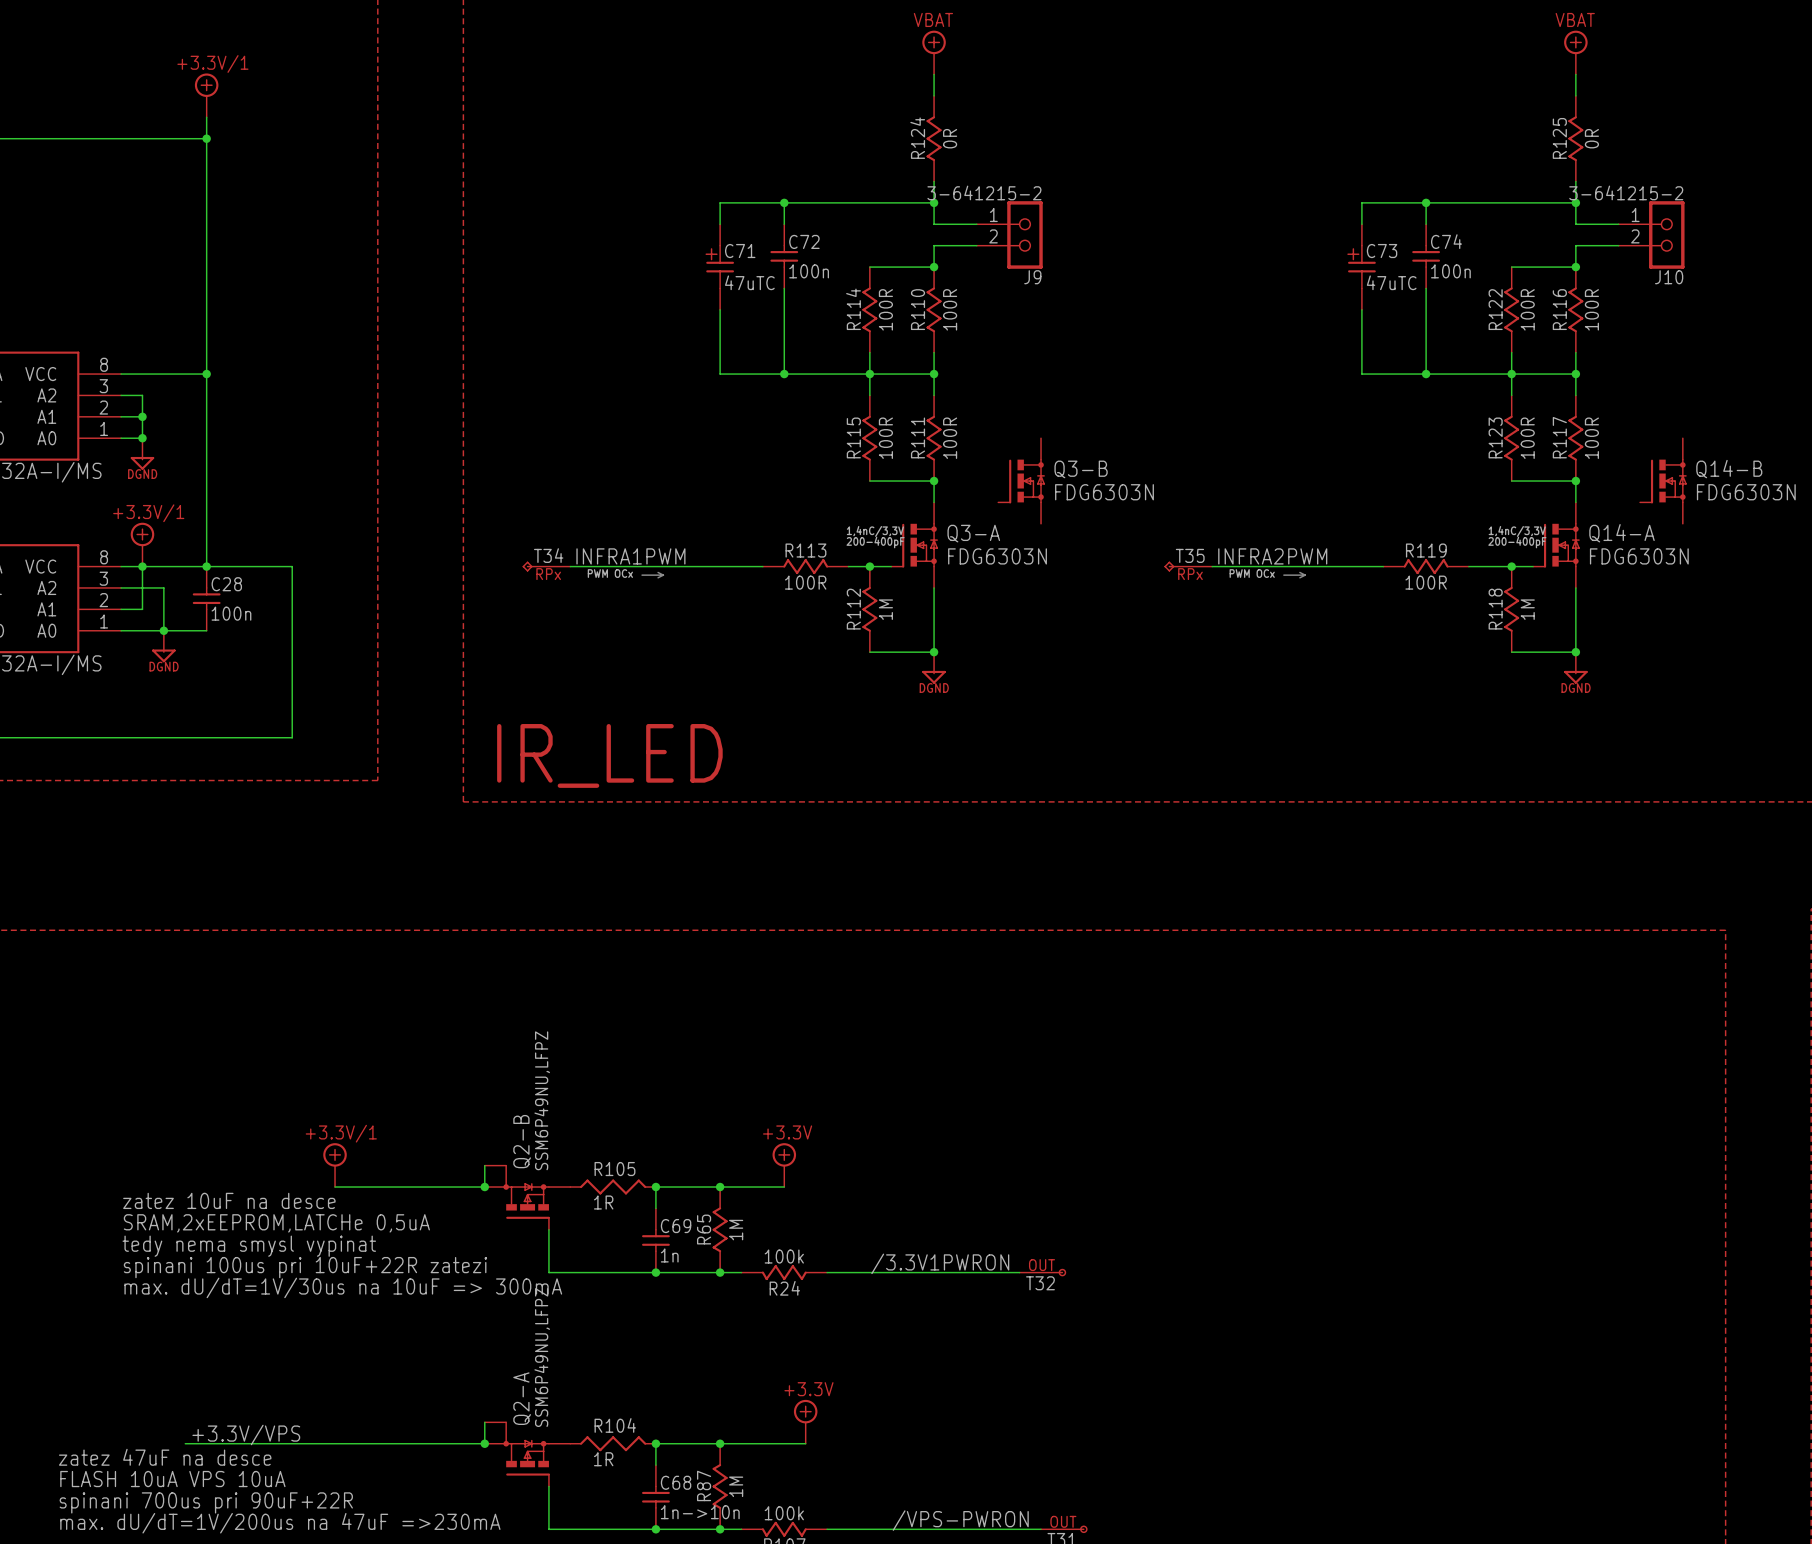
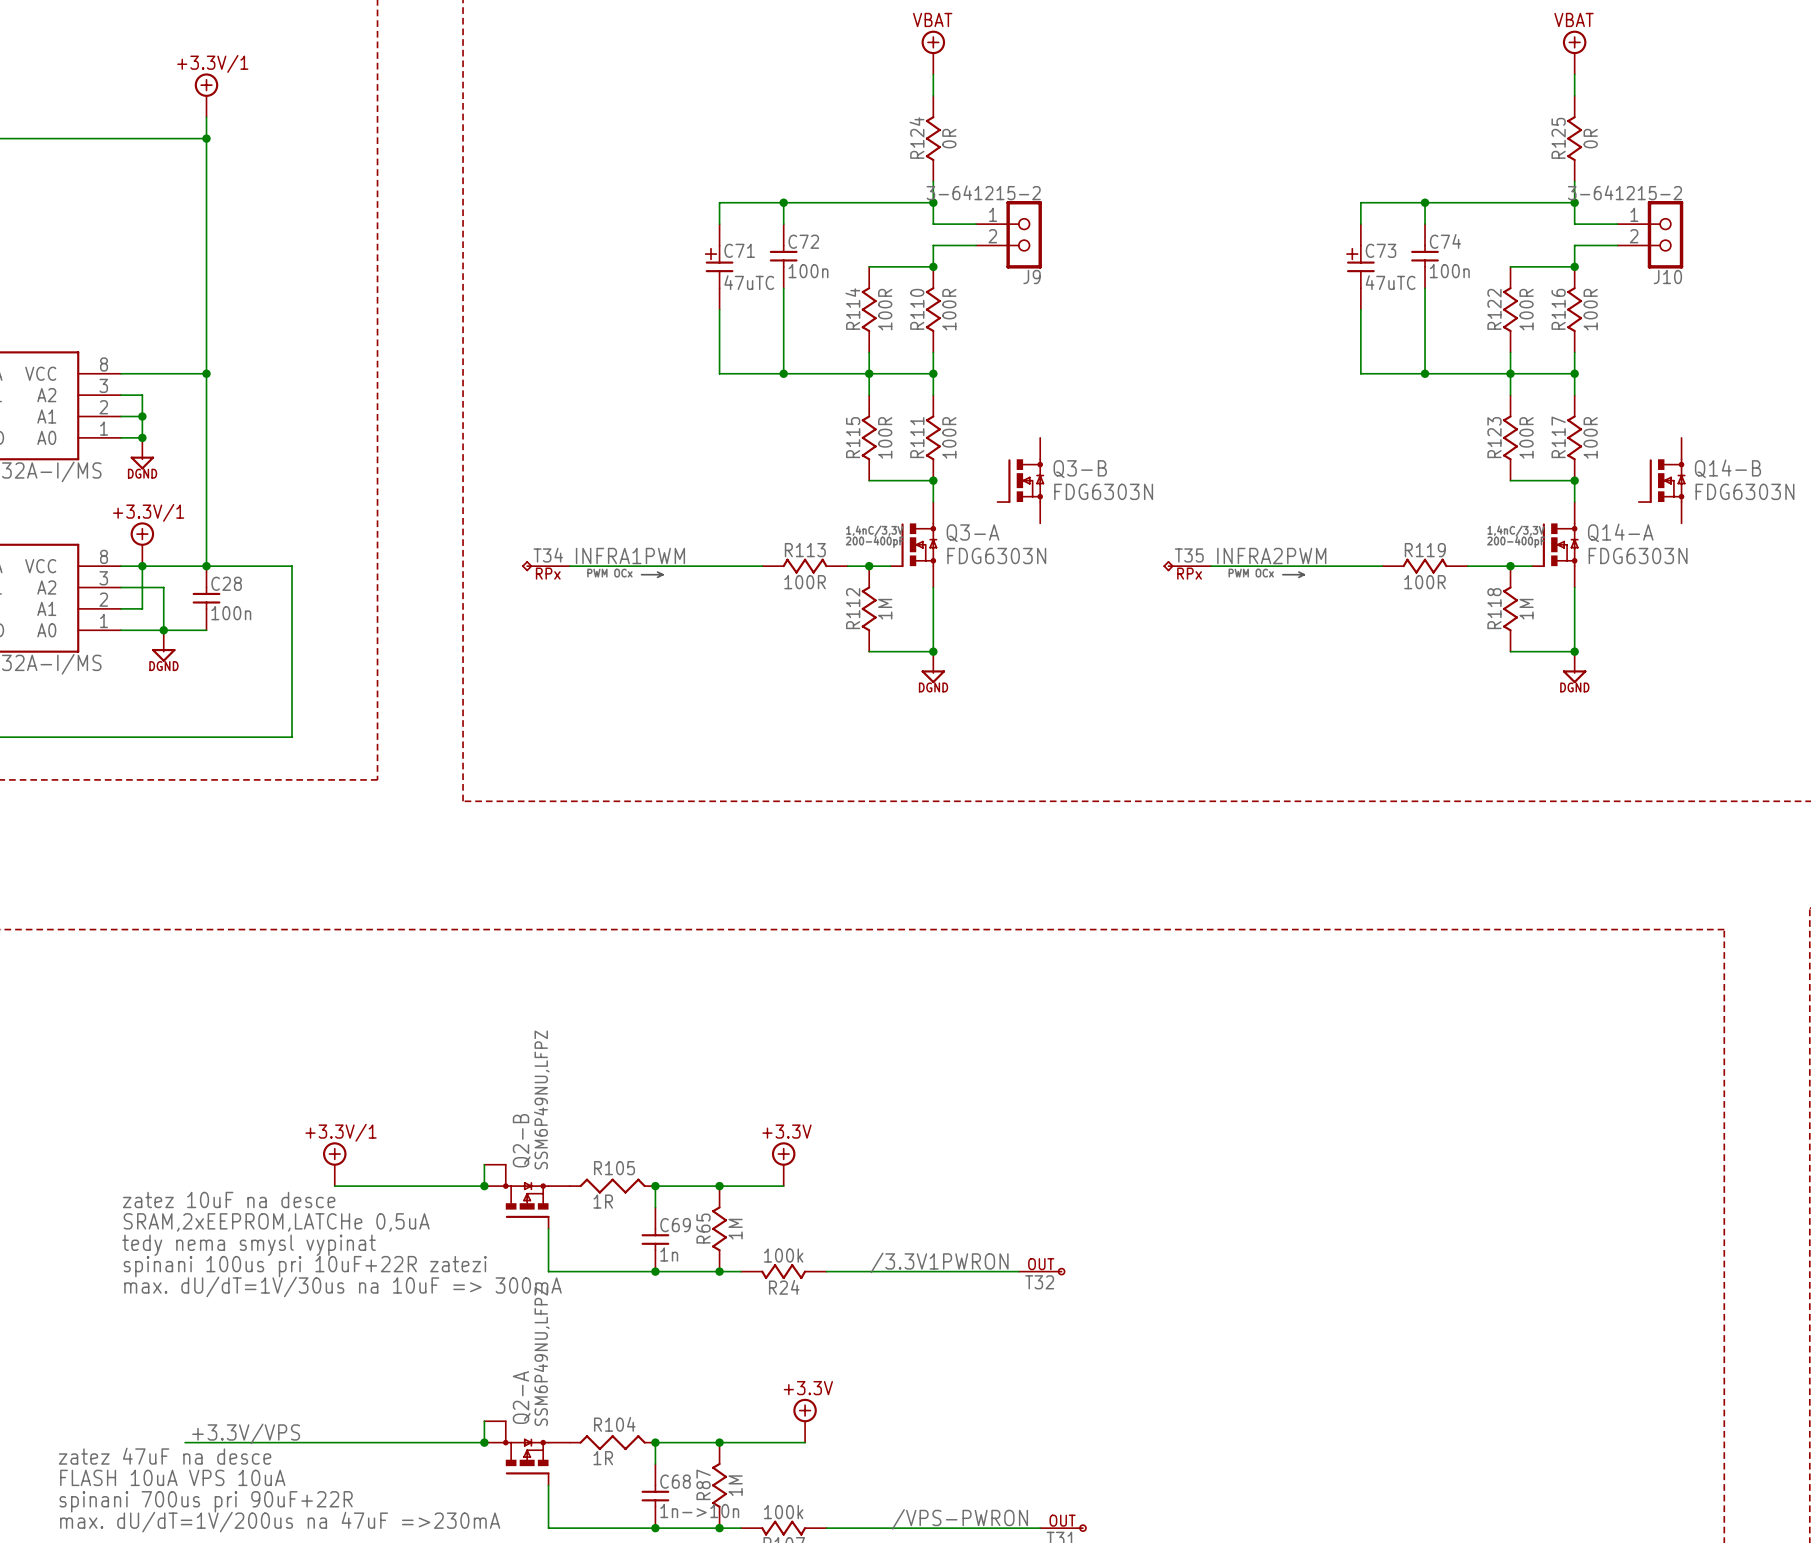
text: IR_LED (609, 755) -> none

